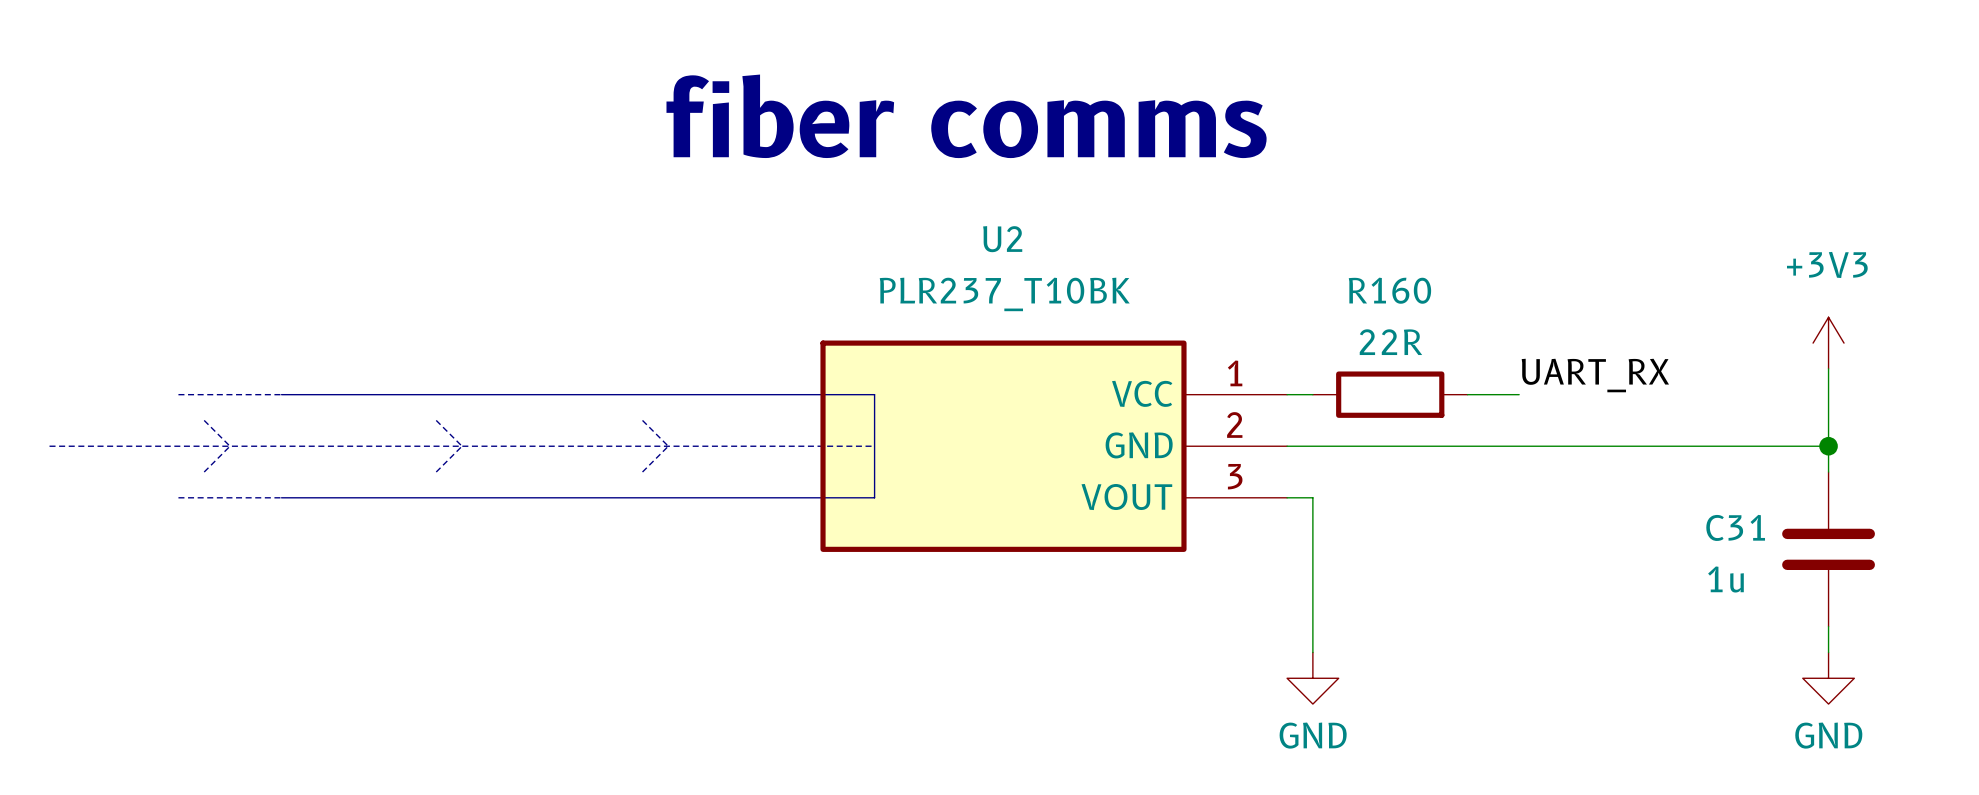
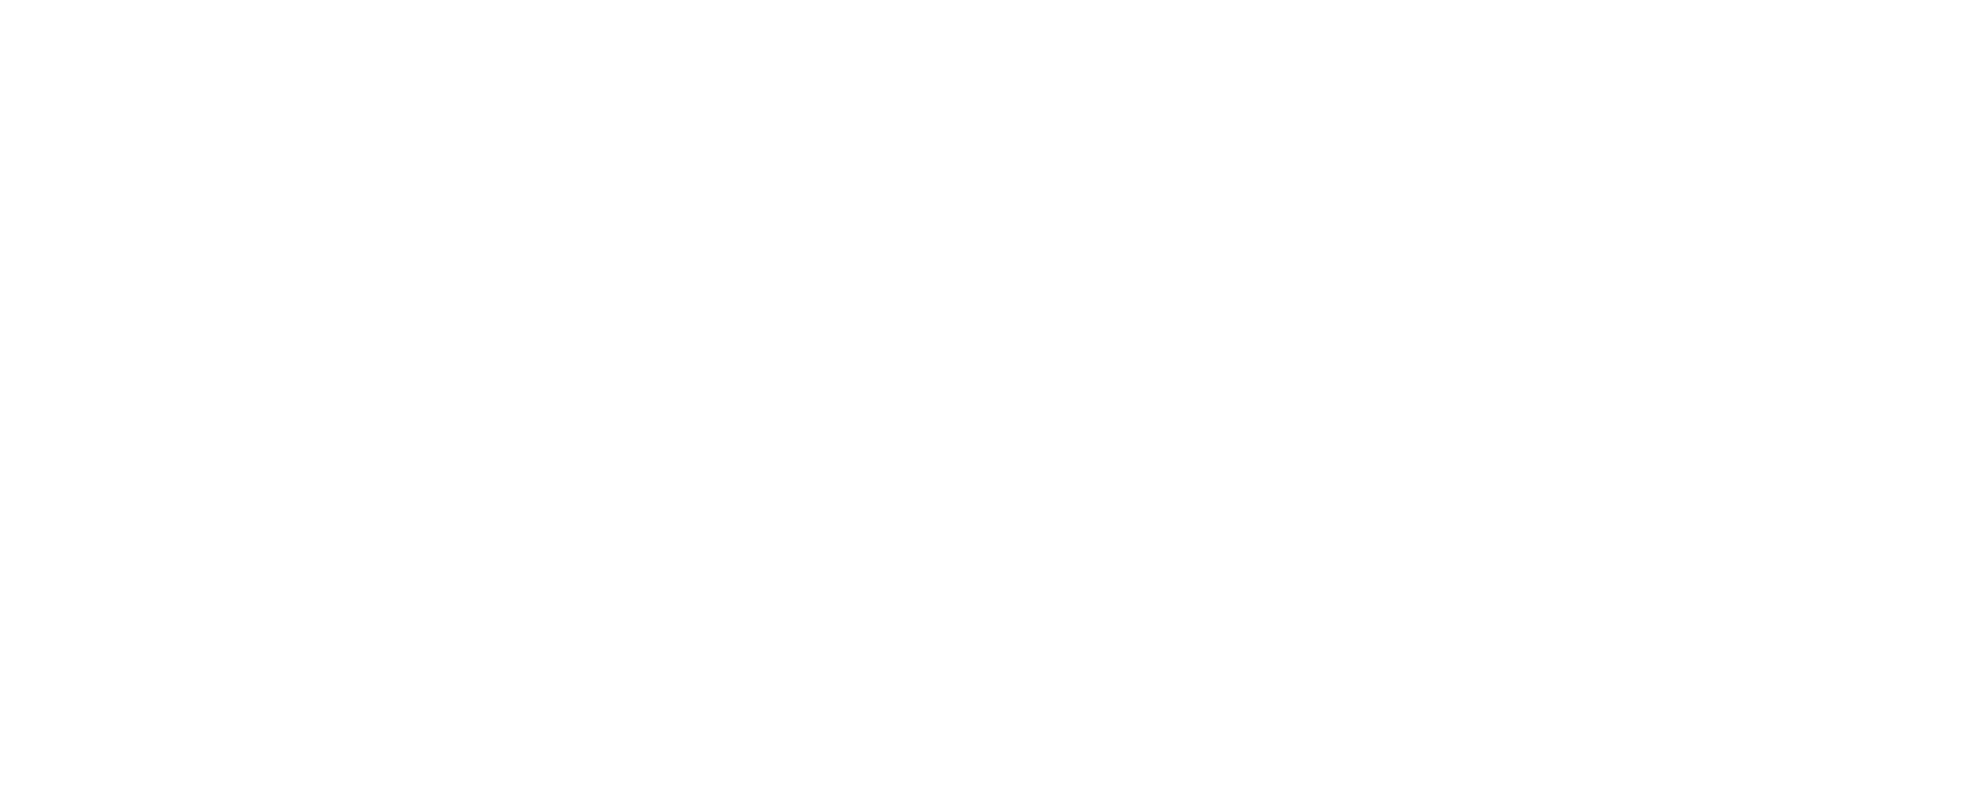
text: fiber comms (966, 116) -> none
power symbol: +3V3 (1828, 343) -> none
wire: (1828, 368) (1828, 472) -> none
label: UART_RX (1595, 375) -> none
line: (178, 394) (874, 394) (874, 497) (178, 497) -> none
wire: (1287, 394) (1312, 394) -> none
R160: 22R (1390, 394) -> none
wire: (1467, 394) (1519, 394) -> none
line: (204, 420) (230, 446) (204, 472) -> none
line: (436, 420) (462, 446) (436, 472) -> none
line: (642, 420) (668, 446) (642, 472) -> none
line: (49, 446) (874, 446) -> none
U2: PLR237_T10BK (1053, 446) -> none
wire: (1287, 446) (1828, 446) -> none
junction: (1828, 446) -> none
wire: (1287, 497) (1312, 497) (1312, 652) -> none
C31: 1u (1828, 549) -> none
wire: (1828, 626) (1828, 652) -> none
power symbol: GND (1312, 678) -> none
power symbol: GND (1828, 678) -> none

